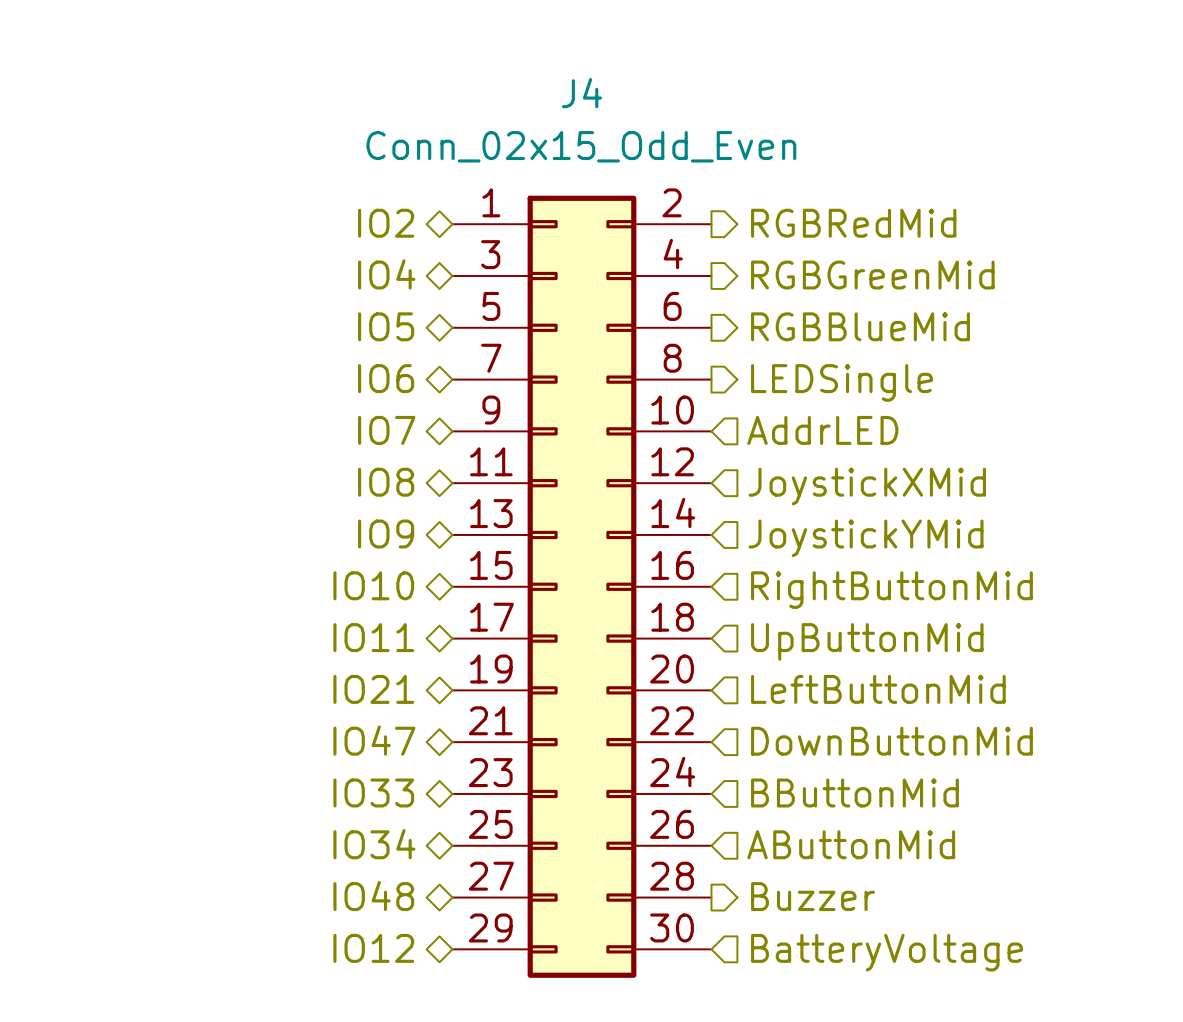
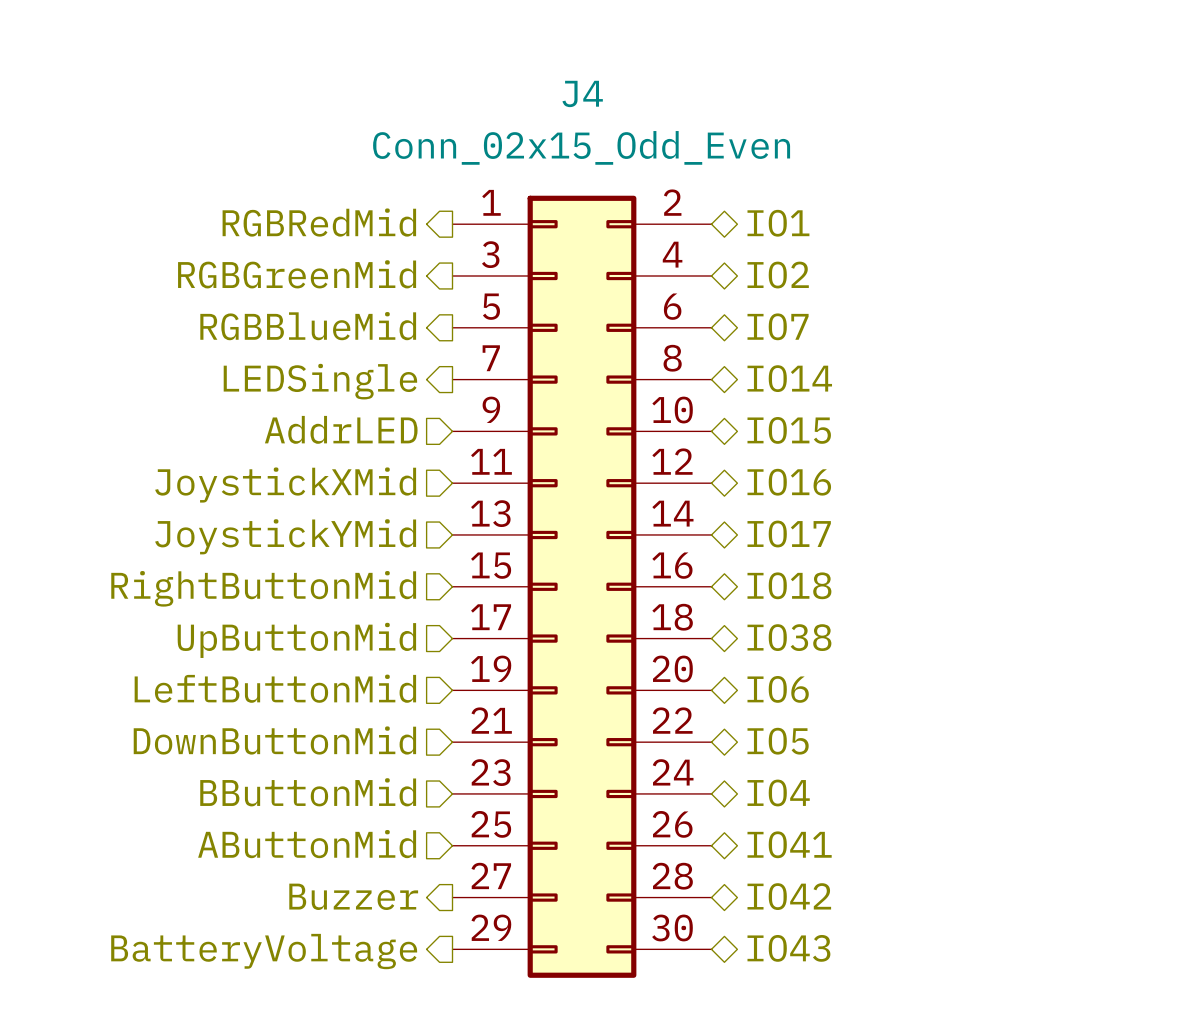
hierarchical label shape: bidirectional (386, 223) -> output (319, 222)
hierarchical label: IO2 (386, 223) -> RGBRedMid (319, 222)
hierarchical label shape: output (853, 223) -> bidirectional (778, 223)
hierarchical label: RGBRedMid (853, 223) -> IO1 (778, 223)
hierarchical label shape: bidirectional (386, 274) -> output (297, 274)
hierarchical label: IO4 (386, 274) -> RGBGreenMid (297, 274)
hierarchical label shape: output (872, 275) -> bidirectional (778, 275)
hierarchical label: RGBGreenMid (872, 275) -> IO2 (778, 275)
hierarchical label shape: bidirectional (386, 326) -> output (308, 326)
hierarchical label: IO5 (386, 326) -> RGBBlueMid (308, 326)
hierarchical label shape: output (860, 326) -> bidirectional (778, 326)
hierarchical label: RGBBlueMid (860, 326) -> IO7 (778, 326)
hierarchical label shape: bidirectional (386, 378) -> output (320, 381)
hierarchical label: IO6 (386, 378) -> LEDSingle (320, 381)
hierarchical label shape: output (841, 382) -> bidirectional (789, 378)
hierarchical label: LEDSingle (841, 382) -> IO14 (789, 378)
hierarchical label shape: bidirectional (386, 430) -> input (341, 429)
hierarchical label: IO7 (386, 430) -> AddrLED (341, 429)
hierarchical label shape: input (822, 430) -> bidirectional (789, 430)
hierarchical label: AddrLED (822, 430) -> IO15 (789, 430)
hierarchical label shape: bidirectional (386, 482) -> input (285, 485)
hierarchical label: IO8 (386, 482) -> JoystickXMid (285, 485)
hierarchical label shape: input (867, 486) -> bidirectional (789, 482)
hierarchical label: JoystickXMid (867, 486) -> IO16 (789, 482)
hierarchical label shape: bidirectional (386, 534) -> input (285, 536)
hierarchical label: IO9 (386, 534) -> JoystickYMid (285, 536)
hierarchical label shape: input (866, 538) -> bidirectional (789, 534)
hierarchical label: JoystickYMid (866, 538) -> IO17 (789, 534)
hierarchical label shape: bidirectional (373, 585) -> input (263, 588)
hierarchical label: IO10 (373, 585) -> RightButtonMid (263, 588)
hierarchical label shape: input (891, 590) -> bidirectional (789, 585)
hierarchical label: RightButtonMid (891, 590) -> IO18 (789, 585)
hierarchical label shape: bidirectional (373, 637) -> input (296, 640)
hierarchical label: IO11 (373, 637) -> UpButtonMid (296, 640)
hierarchical label shape: input (867, 641) -> bidirectional (789, 637)
hierarchical label: UpButtonMid (867, 641) -> IO38 (789, 637)
hierarchical label shape: bidirectional (373, 689) -> input (275, 688)
hierarchical label: IO21 (373, 689) -> LeftButtonMid (275, 688)
hierarchical label shape: input (878, 689) -> bidirectional (778, 689)
hierarchical label: LeftButtonMid (878, 689) -> IO6 (778, 689)
hierarchical label shape: bidirectional (374, 740) -> input (274, 740)
hierarchical label: IO47 (374, 740) -> DownButtonMid (274, 740)
hierarchical label shape: input (891, 741) -> bidirectional (778, 741)
hierarchical label: DownButtonMid (891, 741) -> IO5 (778, 741)
hierarchical label shape: bidirectional (373, 792) -> input (308, 792)
hierarchical label: IO33 (373, 792) -> BButtonMid (308, 792)
hierarchical label shape: input (854, 792) -> bidirectional (778, 792)
hierarchical label: BButtonMid (854, 792) -> IO4 (778, 792)
hierarchical label shape: bidirectional (374, 844) -> input (307, 844)
hierarchical label: IO34 (374, 844) -> AButtonMid (307, 844)
hierarchical label shape: input (851, 844) -> bidirectional (789, 844)
hierarchical label: AButtonMid (851, 844) -> IO41 (789, 844)
hierarchical label shape: bidirectional (373, 895) -> output (353, 896)
hierarchical label: IO48 (373, 895) -> Buzzer (353, 896)
hierarchical label shape: output (813, 896) -> bidirectional (789, 896)
hierarchical label: Buzzer (813, 896) -> IO42 (789, 896)
hierarchical label shape: bidirectional (373, 948) -> output (264, 951)
hierarchical label: IO12 (373, 948) -> BatteryVoltage (264, 951)
hierarchical label shape: input (887, 952) -> bidirectional (788, 948)
hierarchical label: BatteryVoltage (887, 952) -> IO43 (788, 948)

